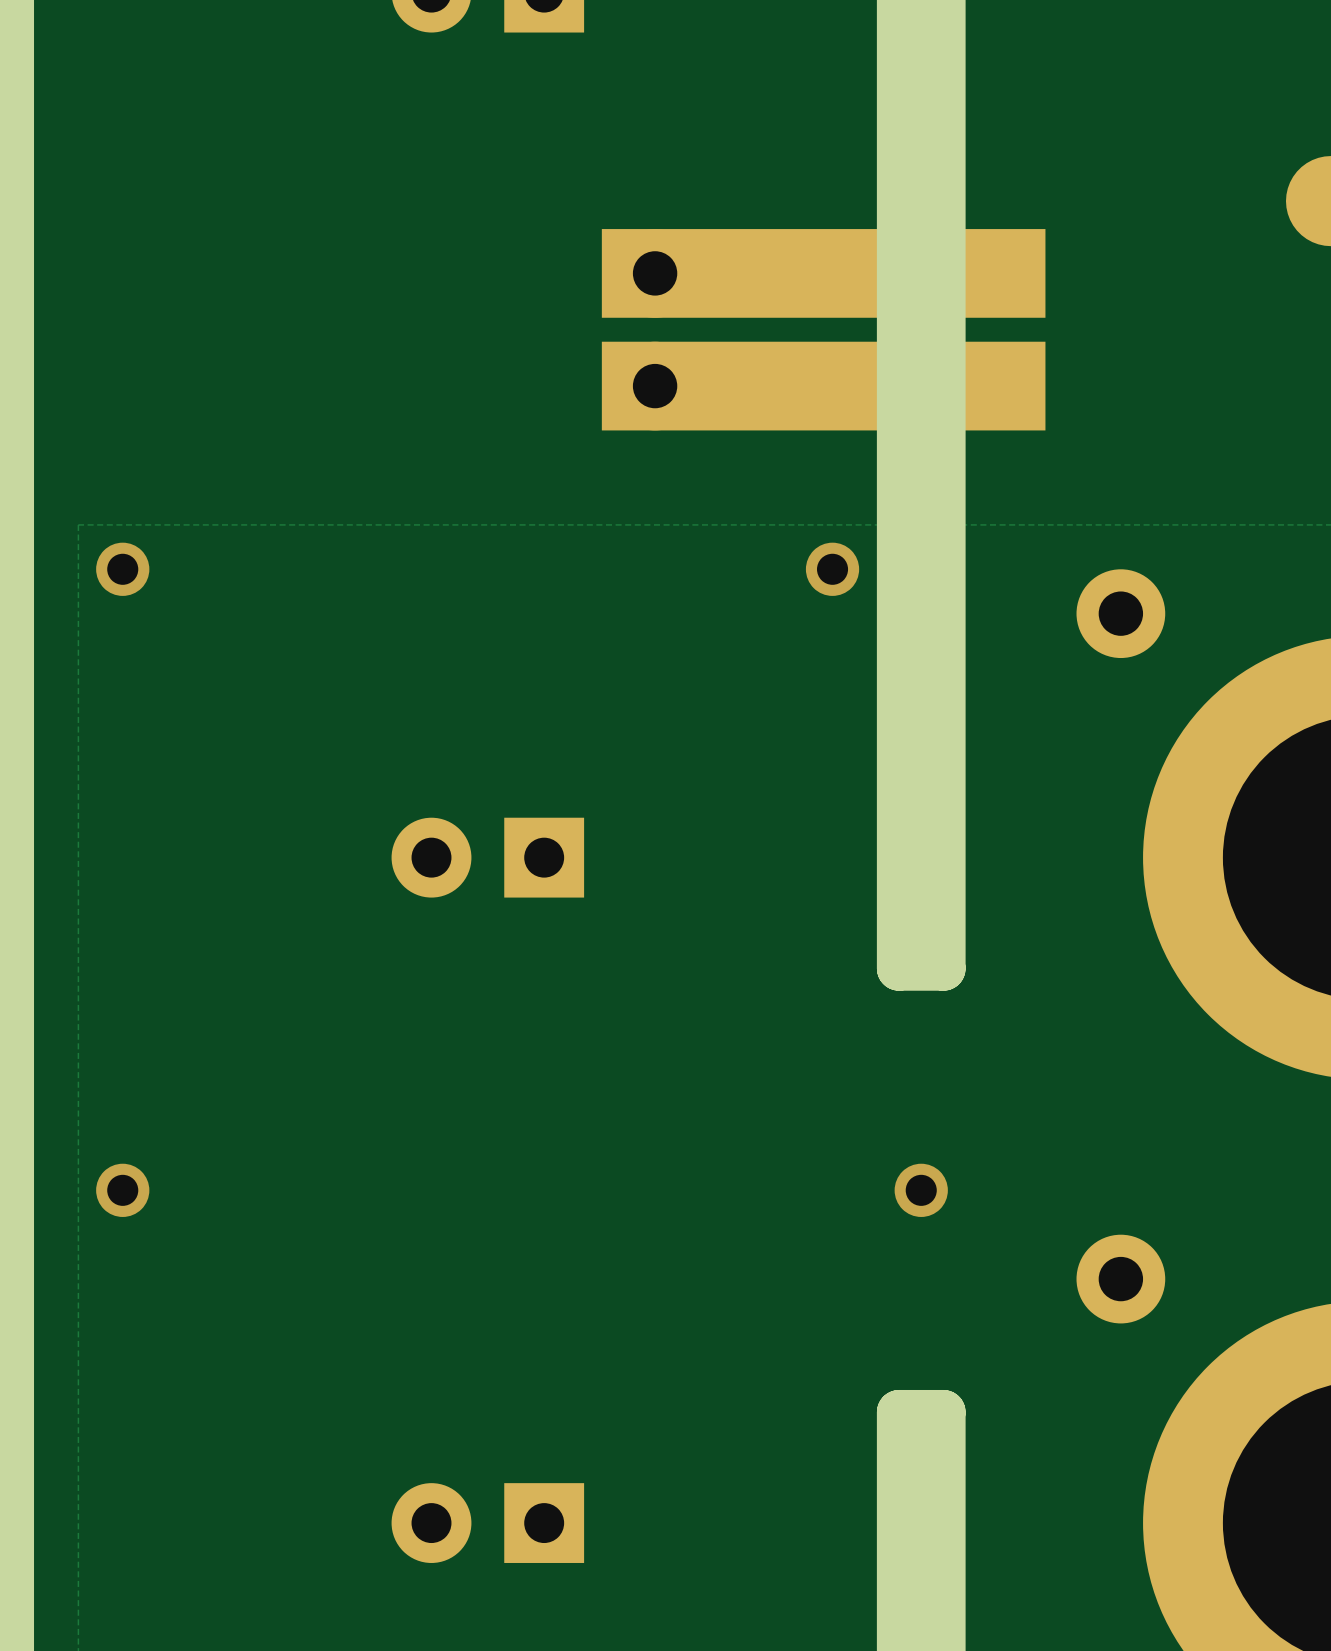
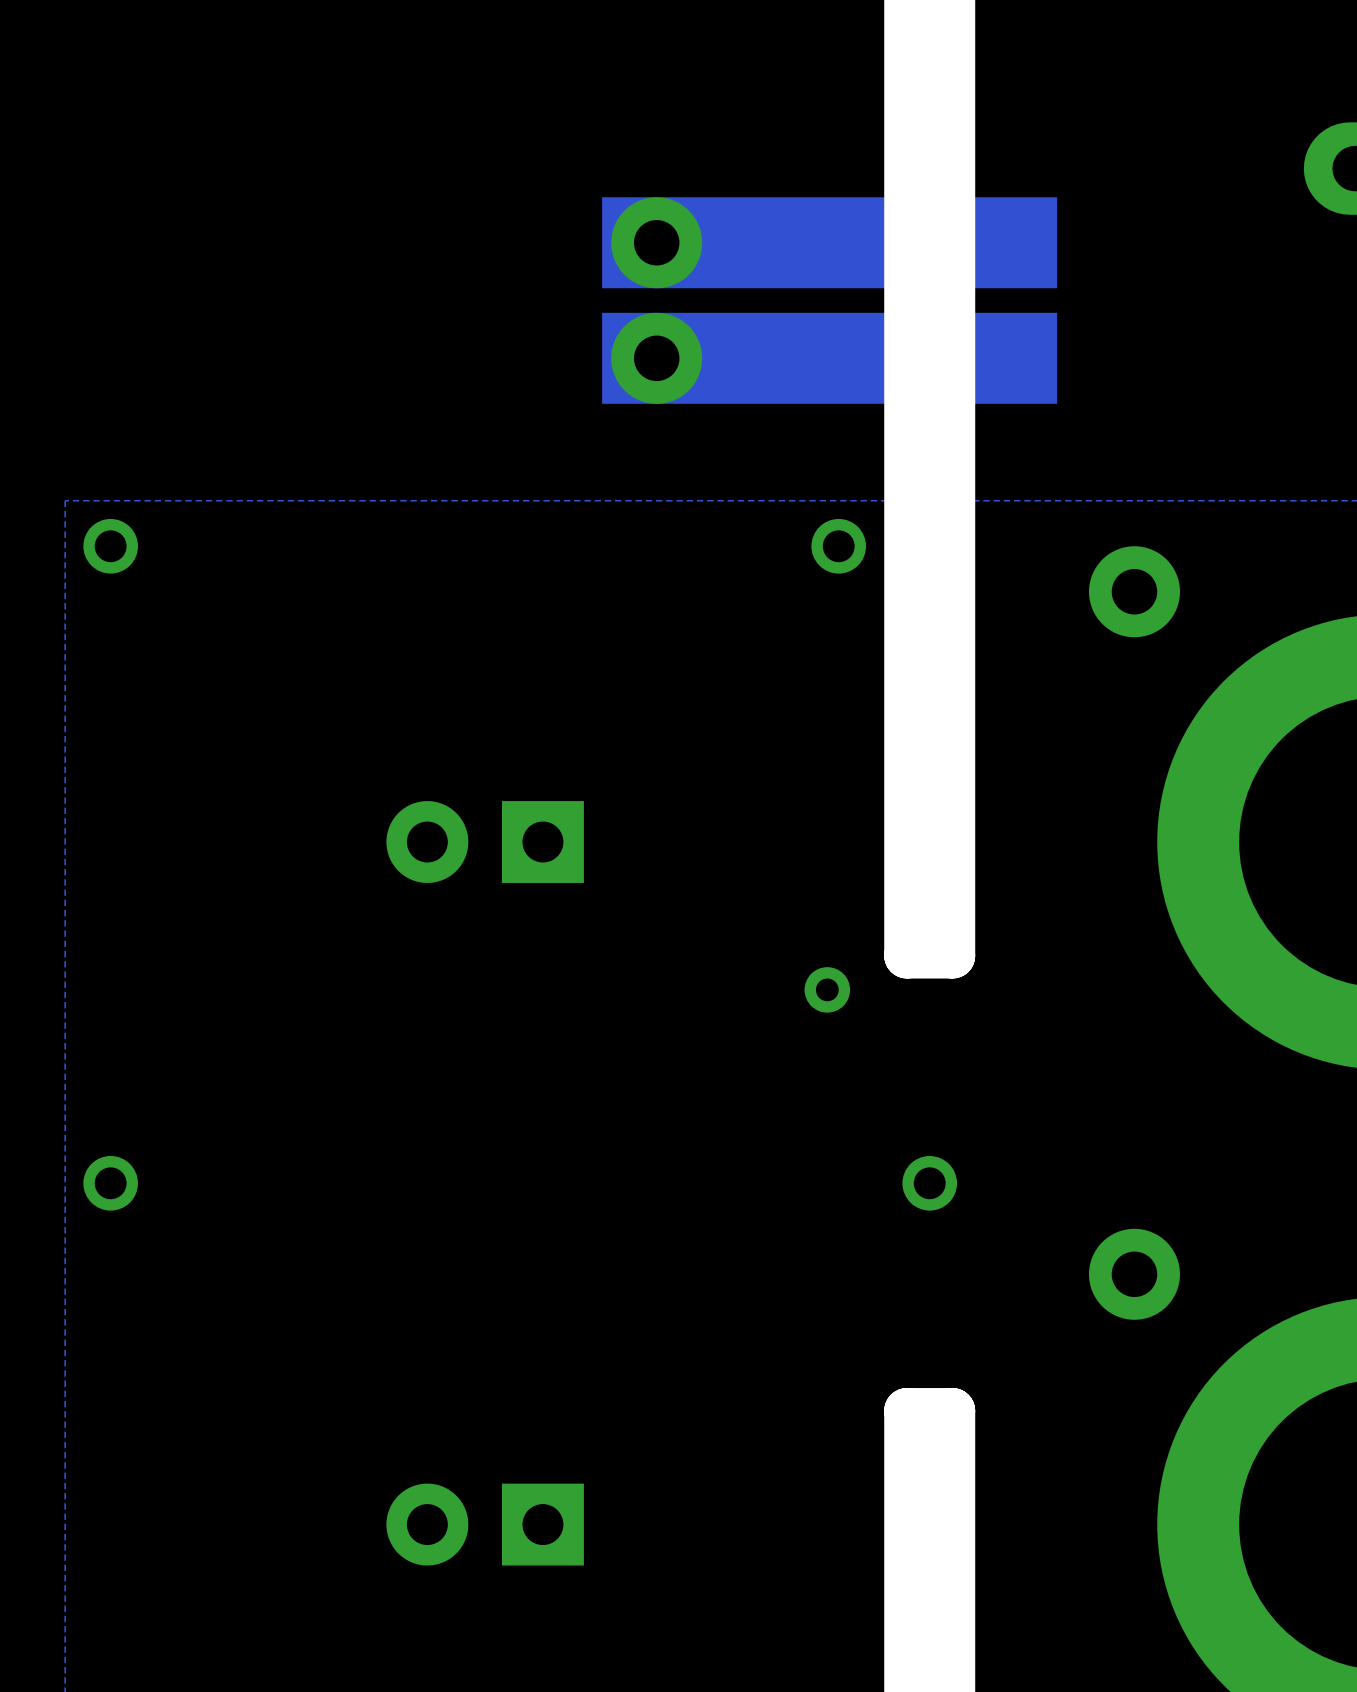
via: none -> (827, 989)

